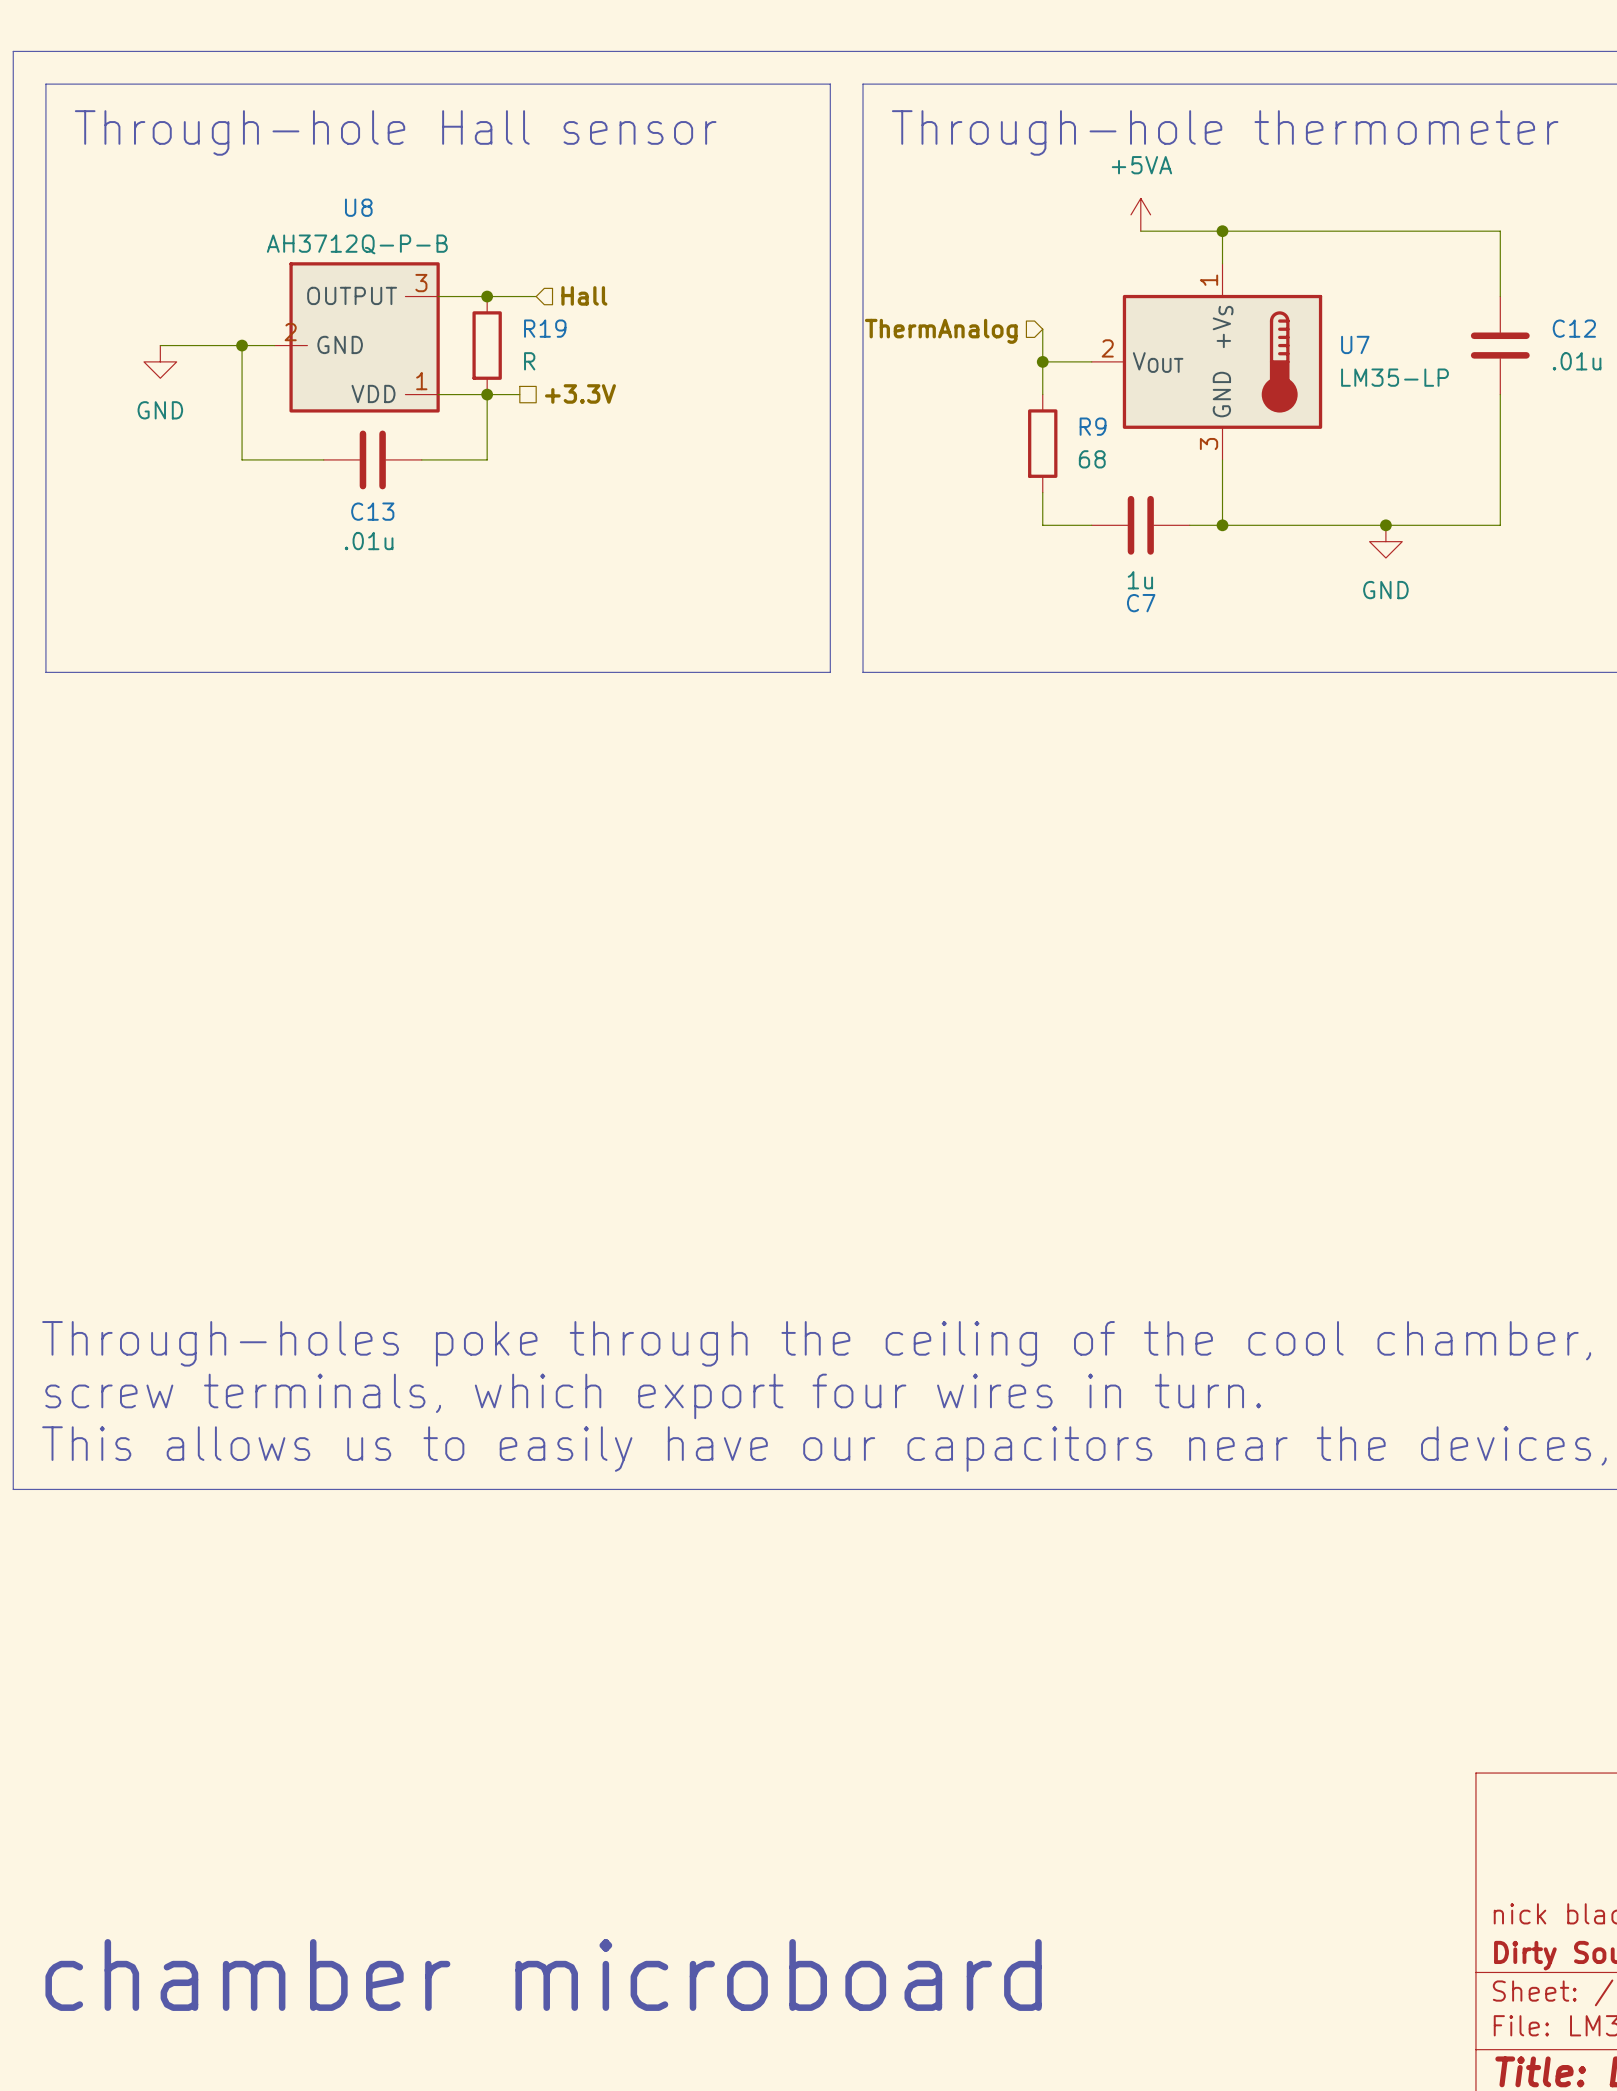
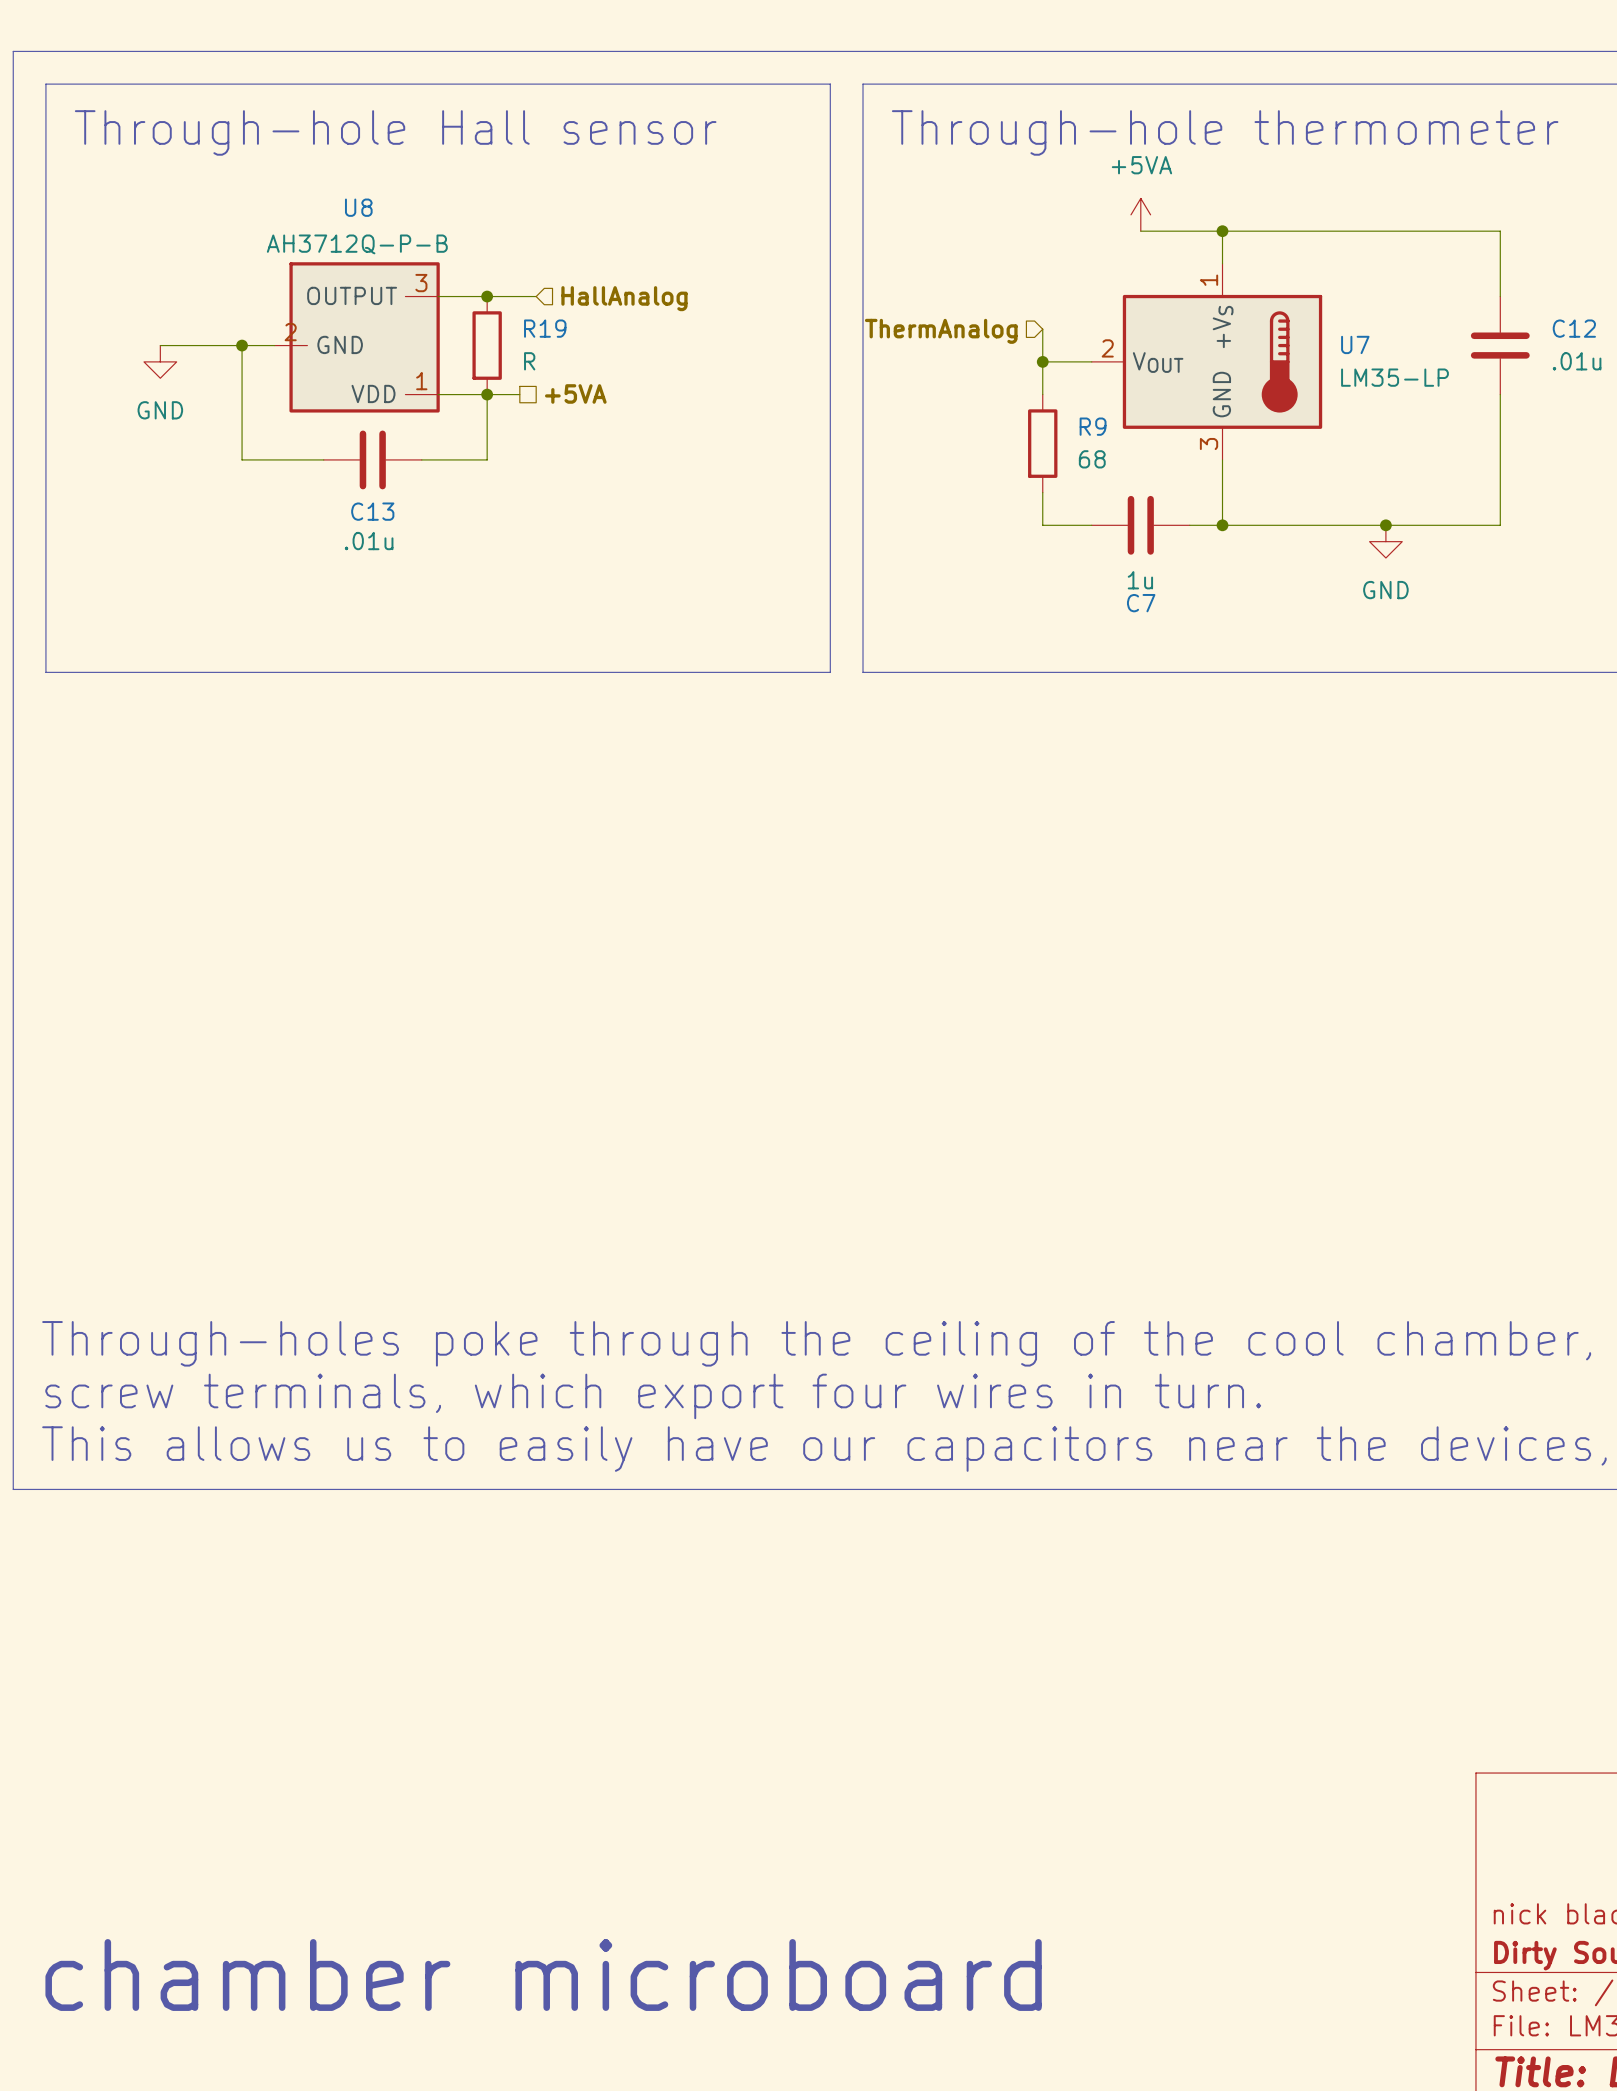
hierarchical label: Hall (584, 295) -> HallAnalog (624, 298)
hierarchical label: +3.3V (580, 393) -> +5VA (575, 393)

